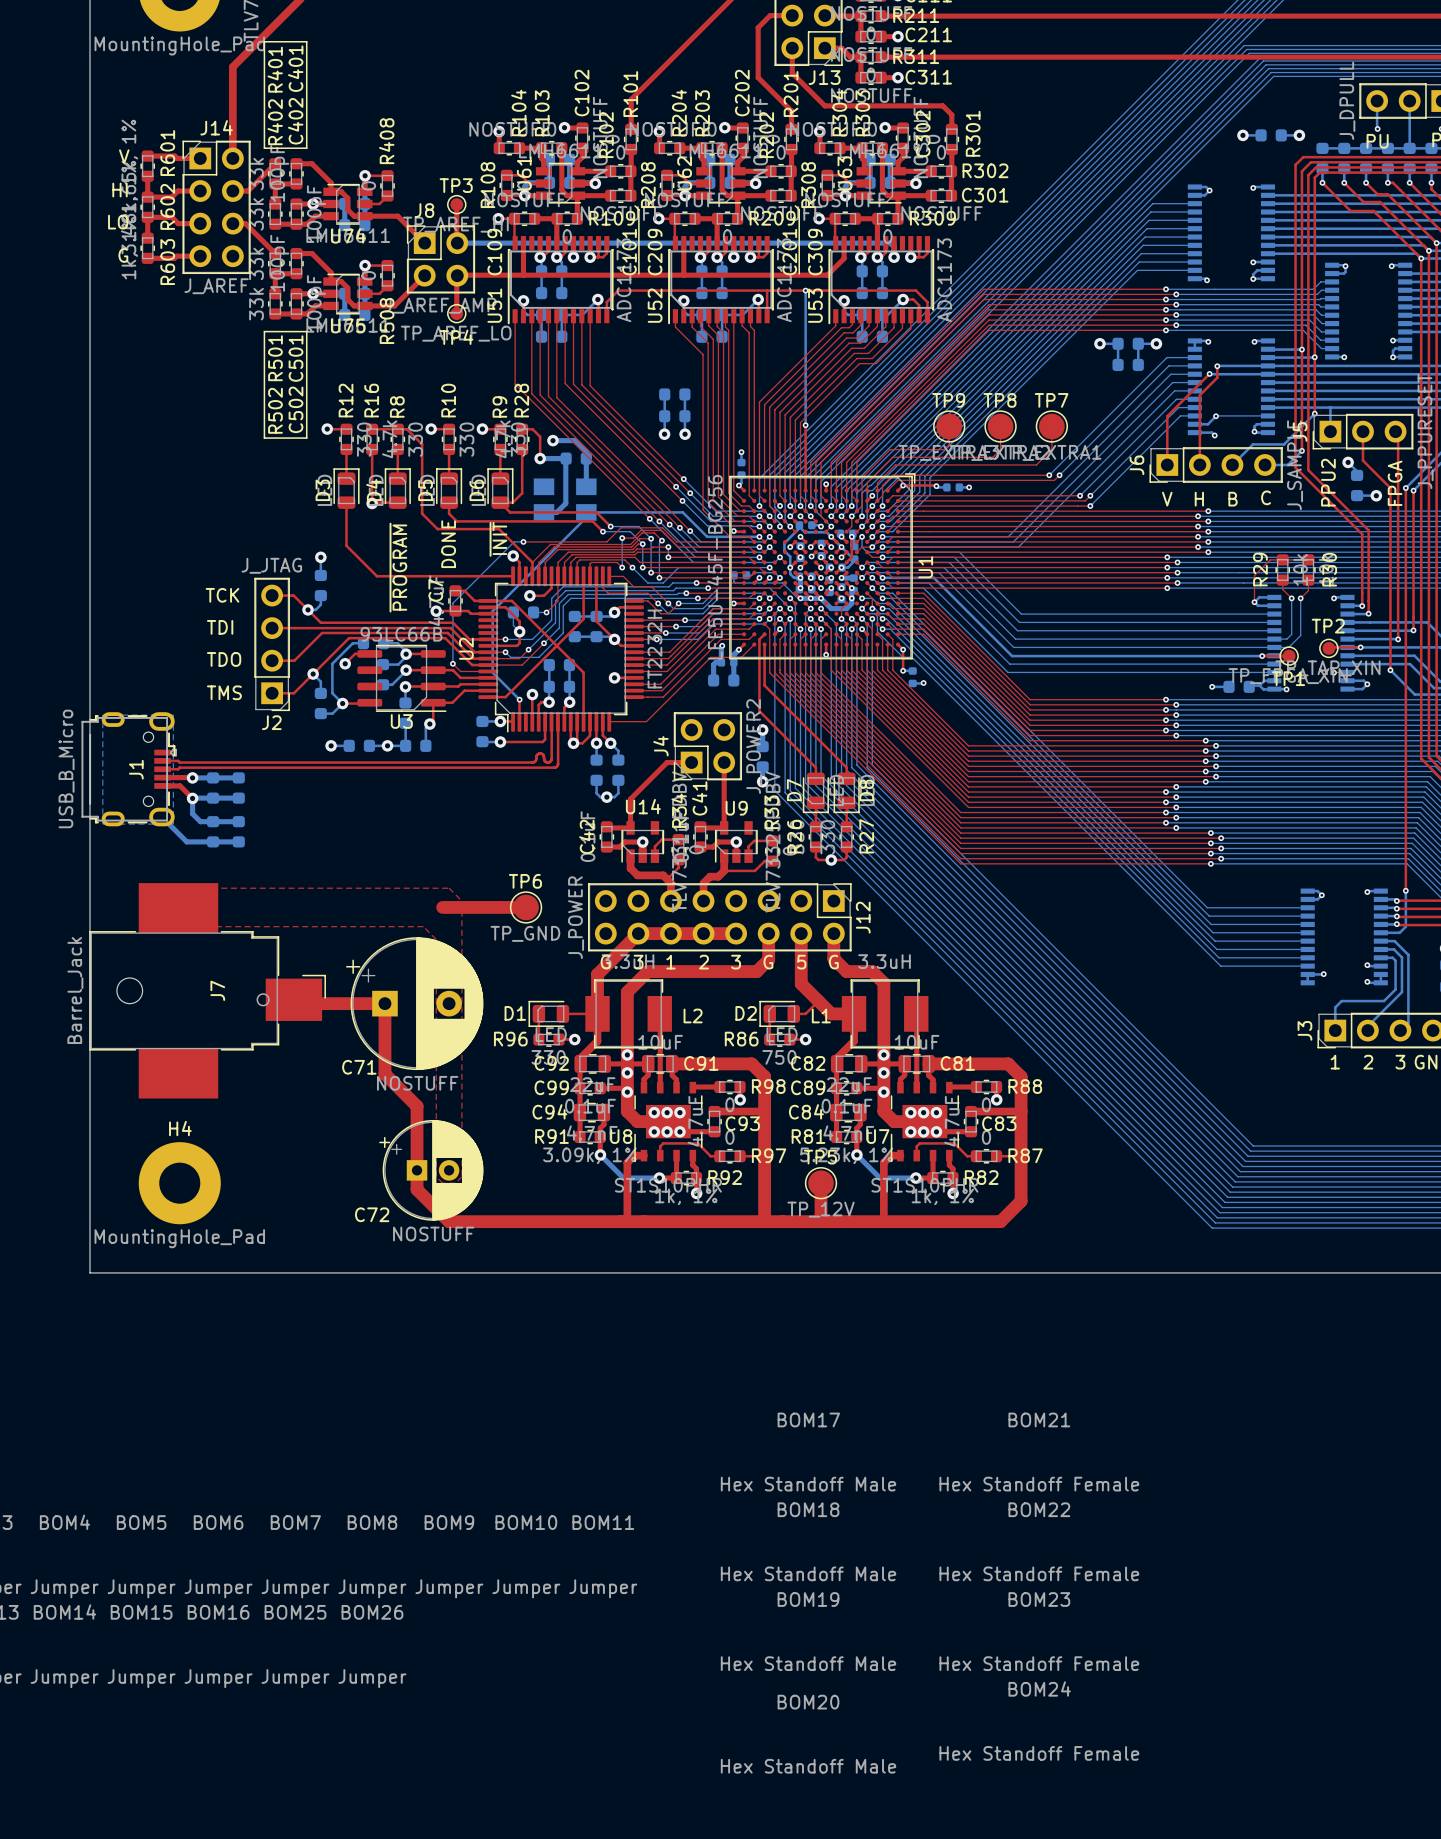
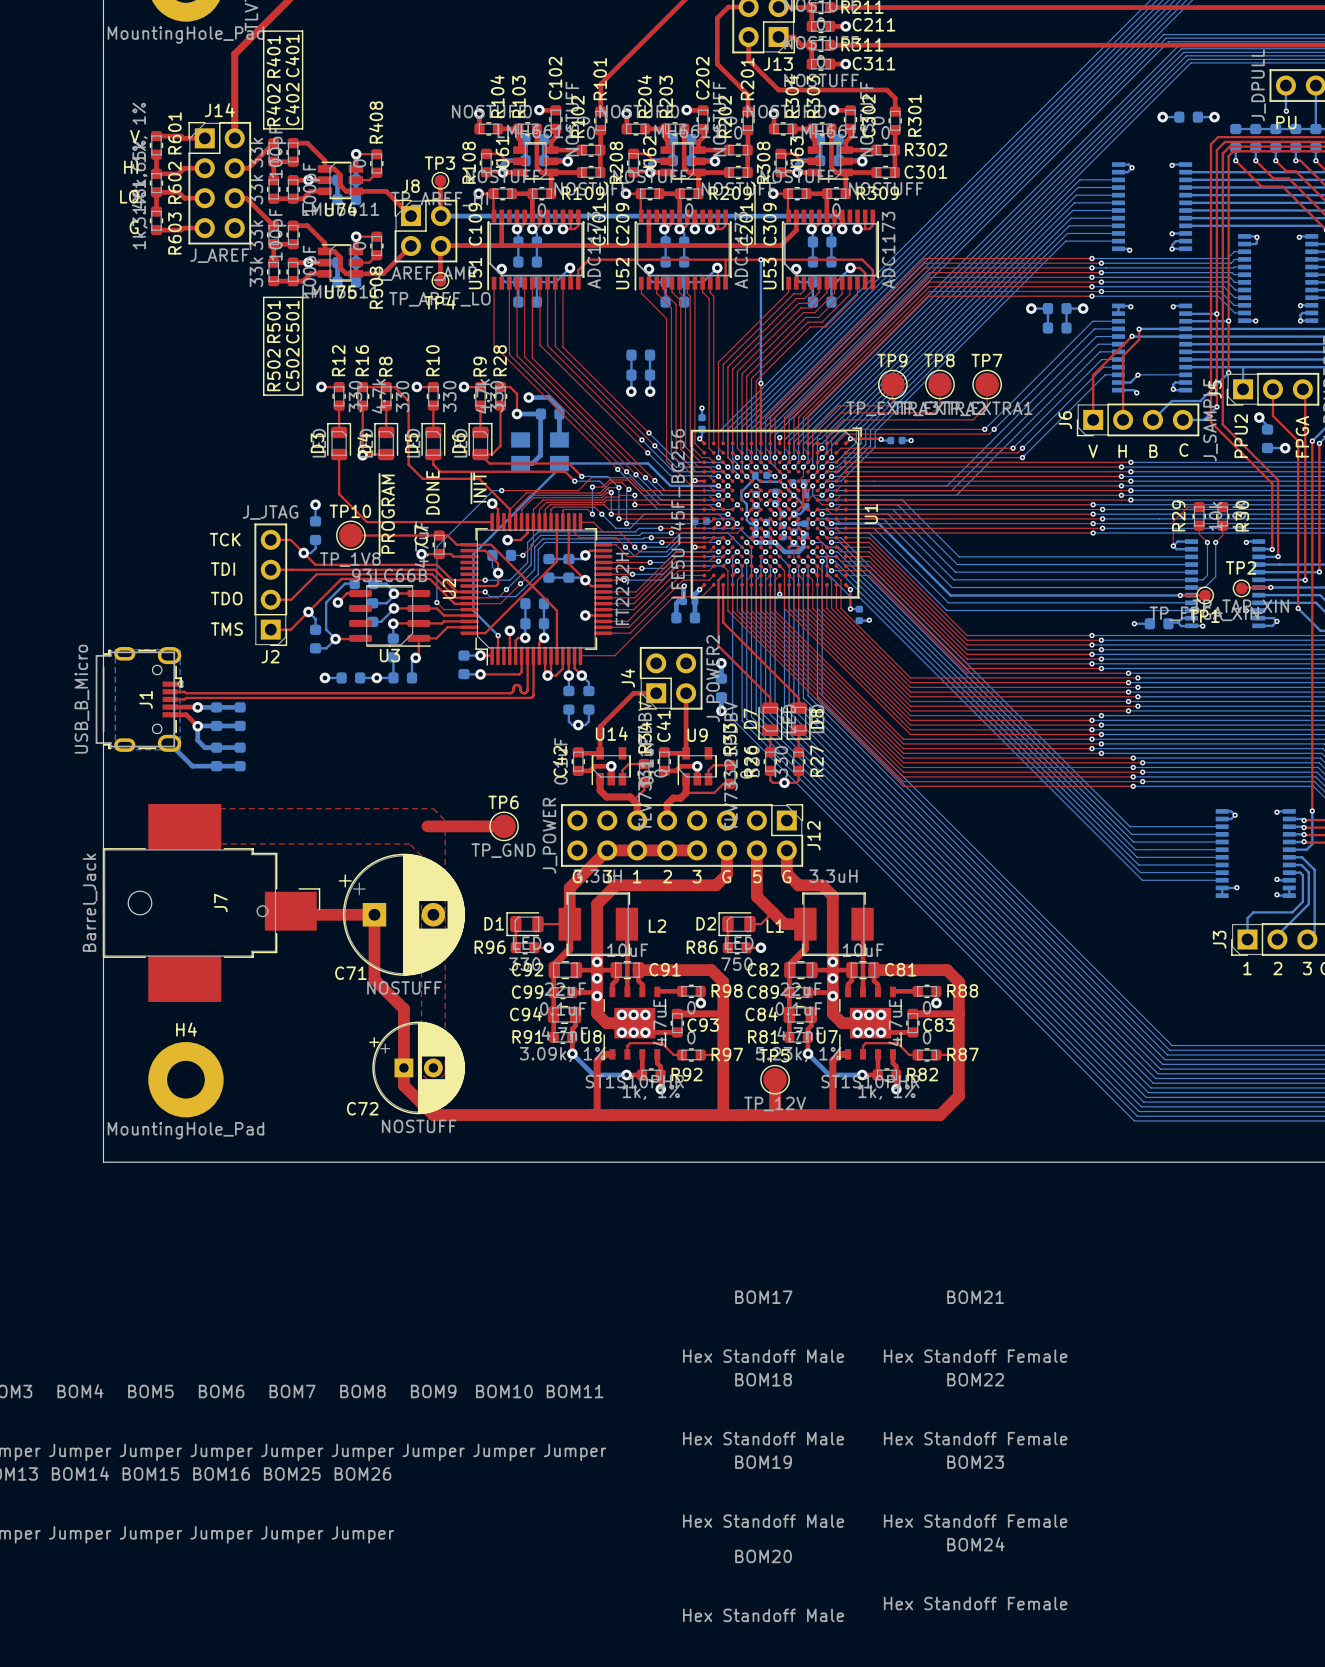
top track: none -> (351, 535) (439, 535)
TP10: none -> TP_1V8 (350, 535)

